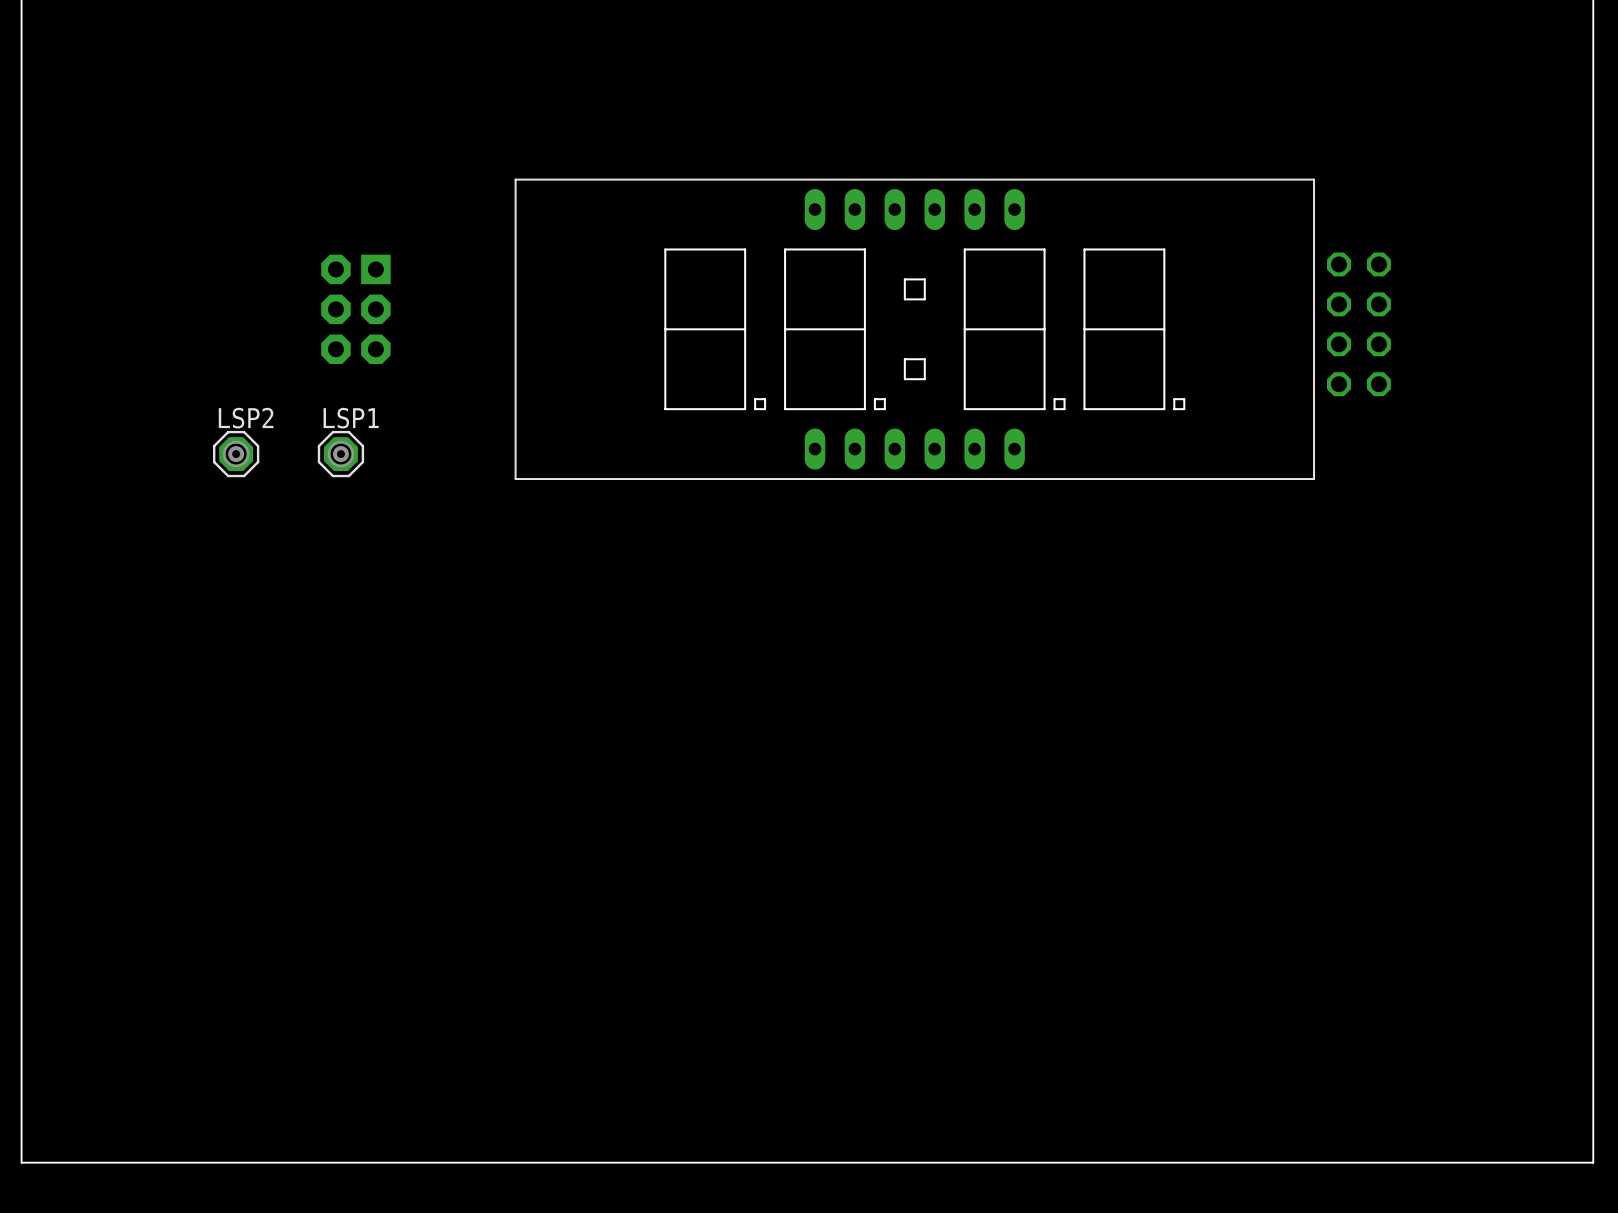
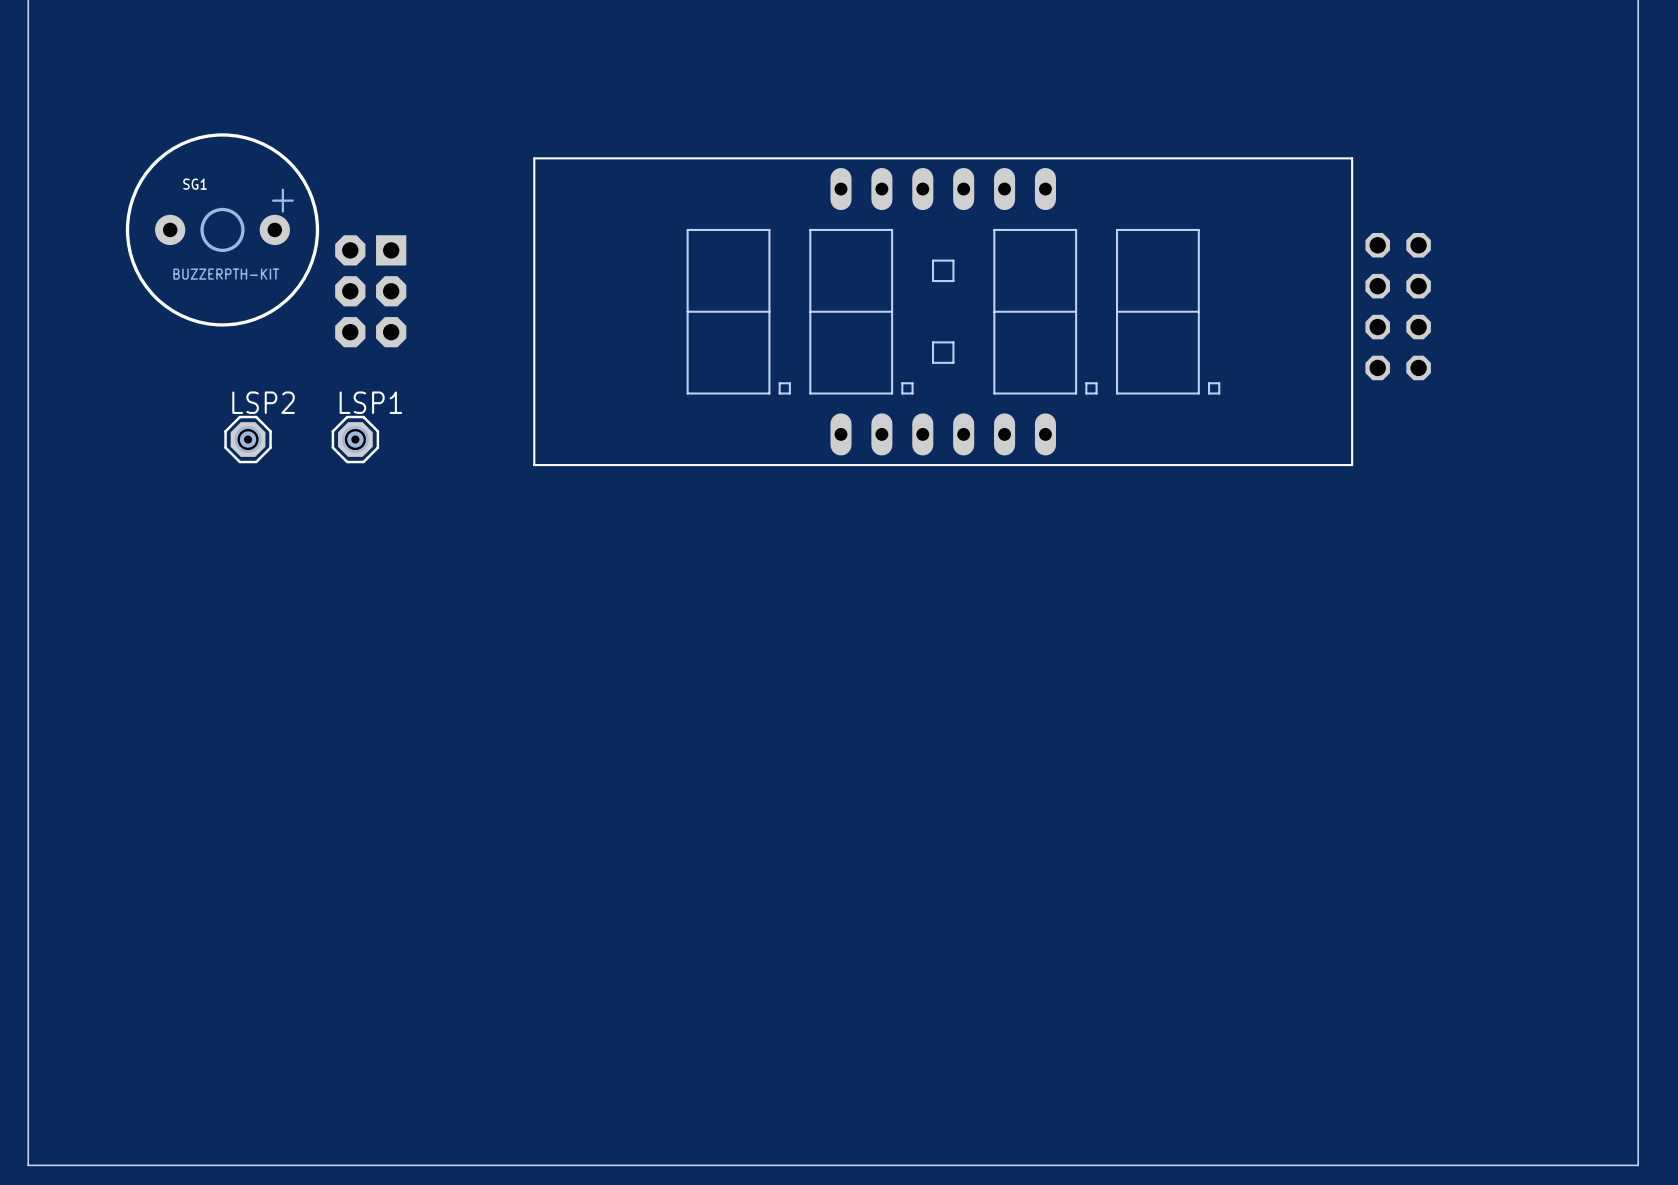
SG1: none -> BUZZERPTH-KIT (222, 229)

